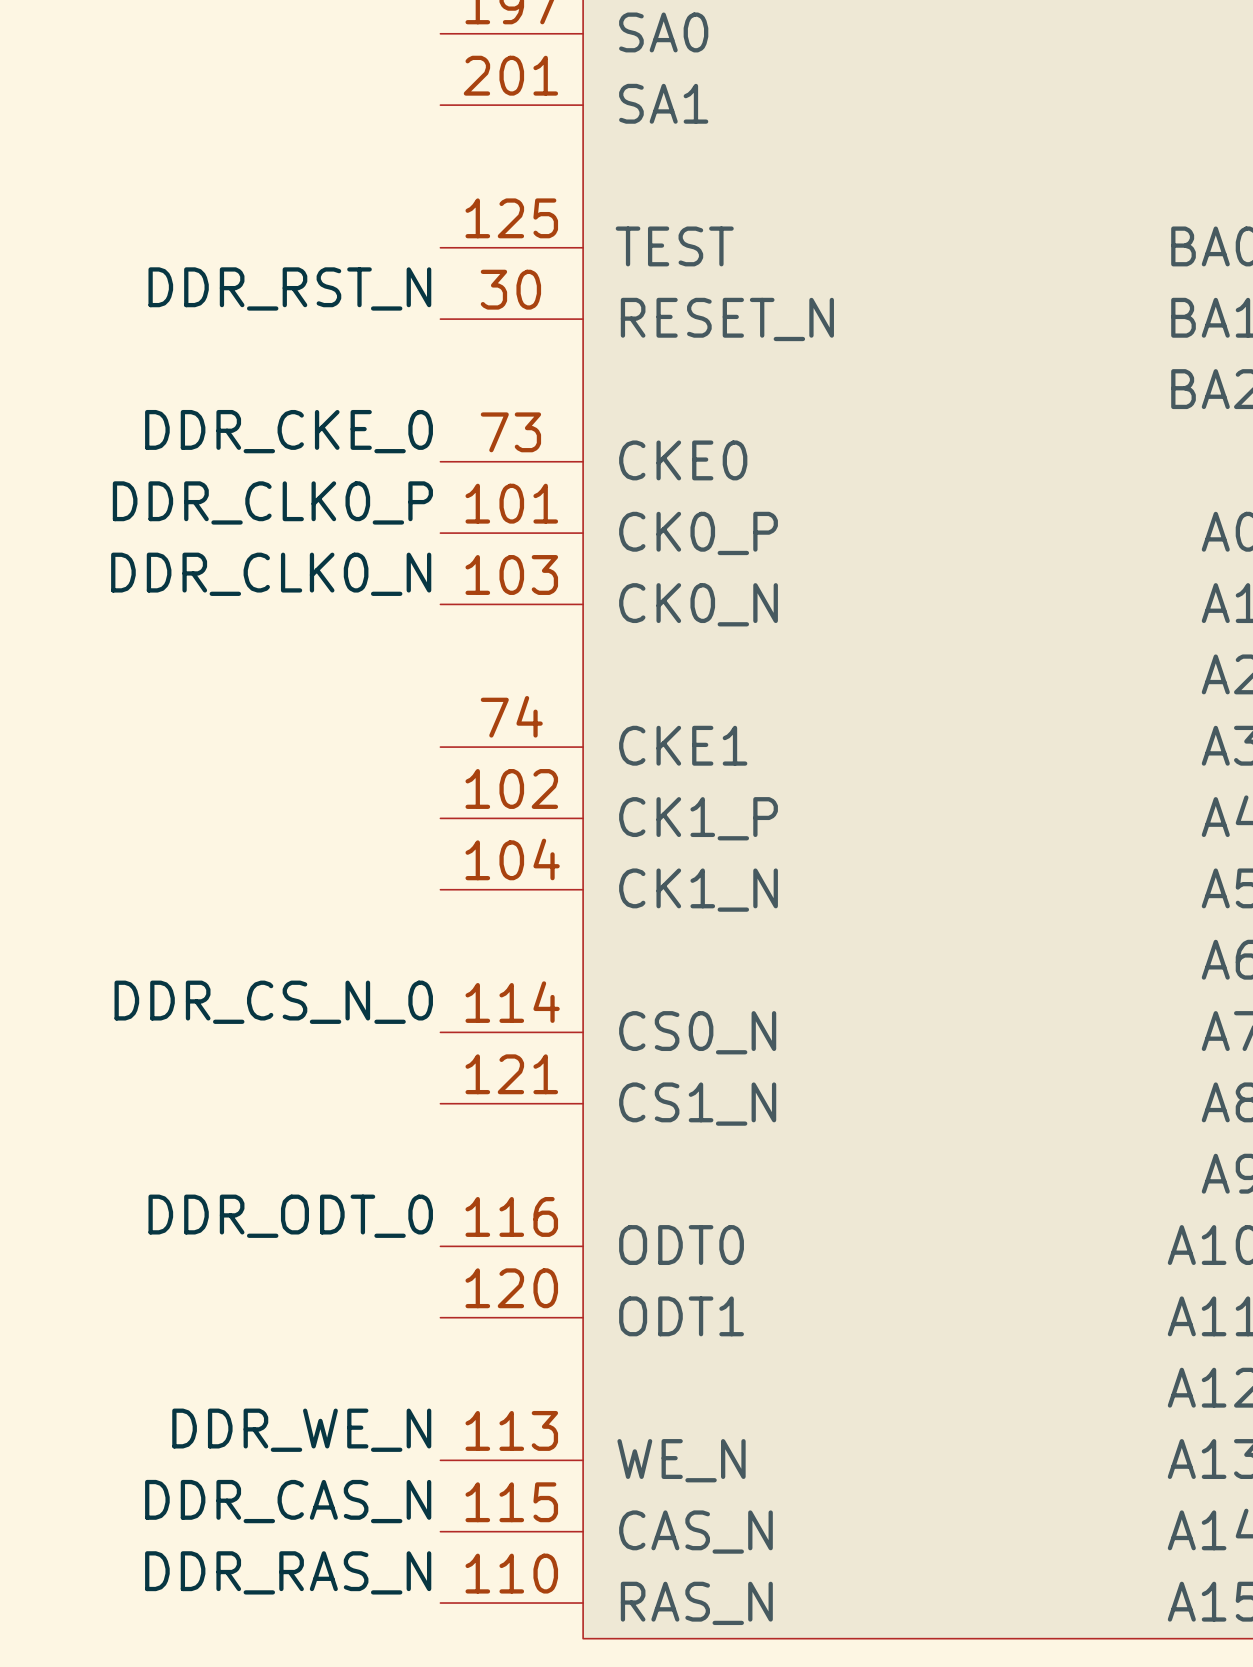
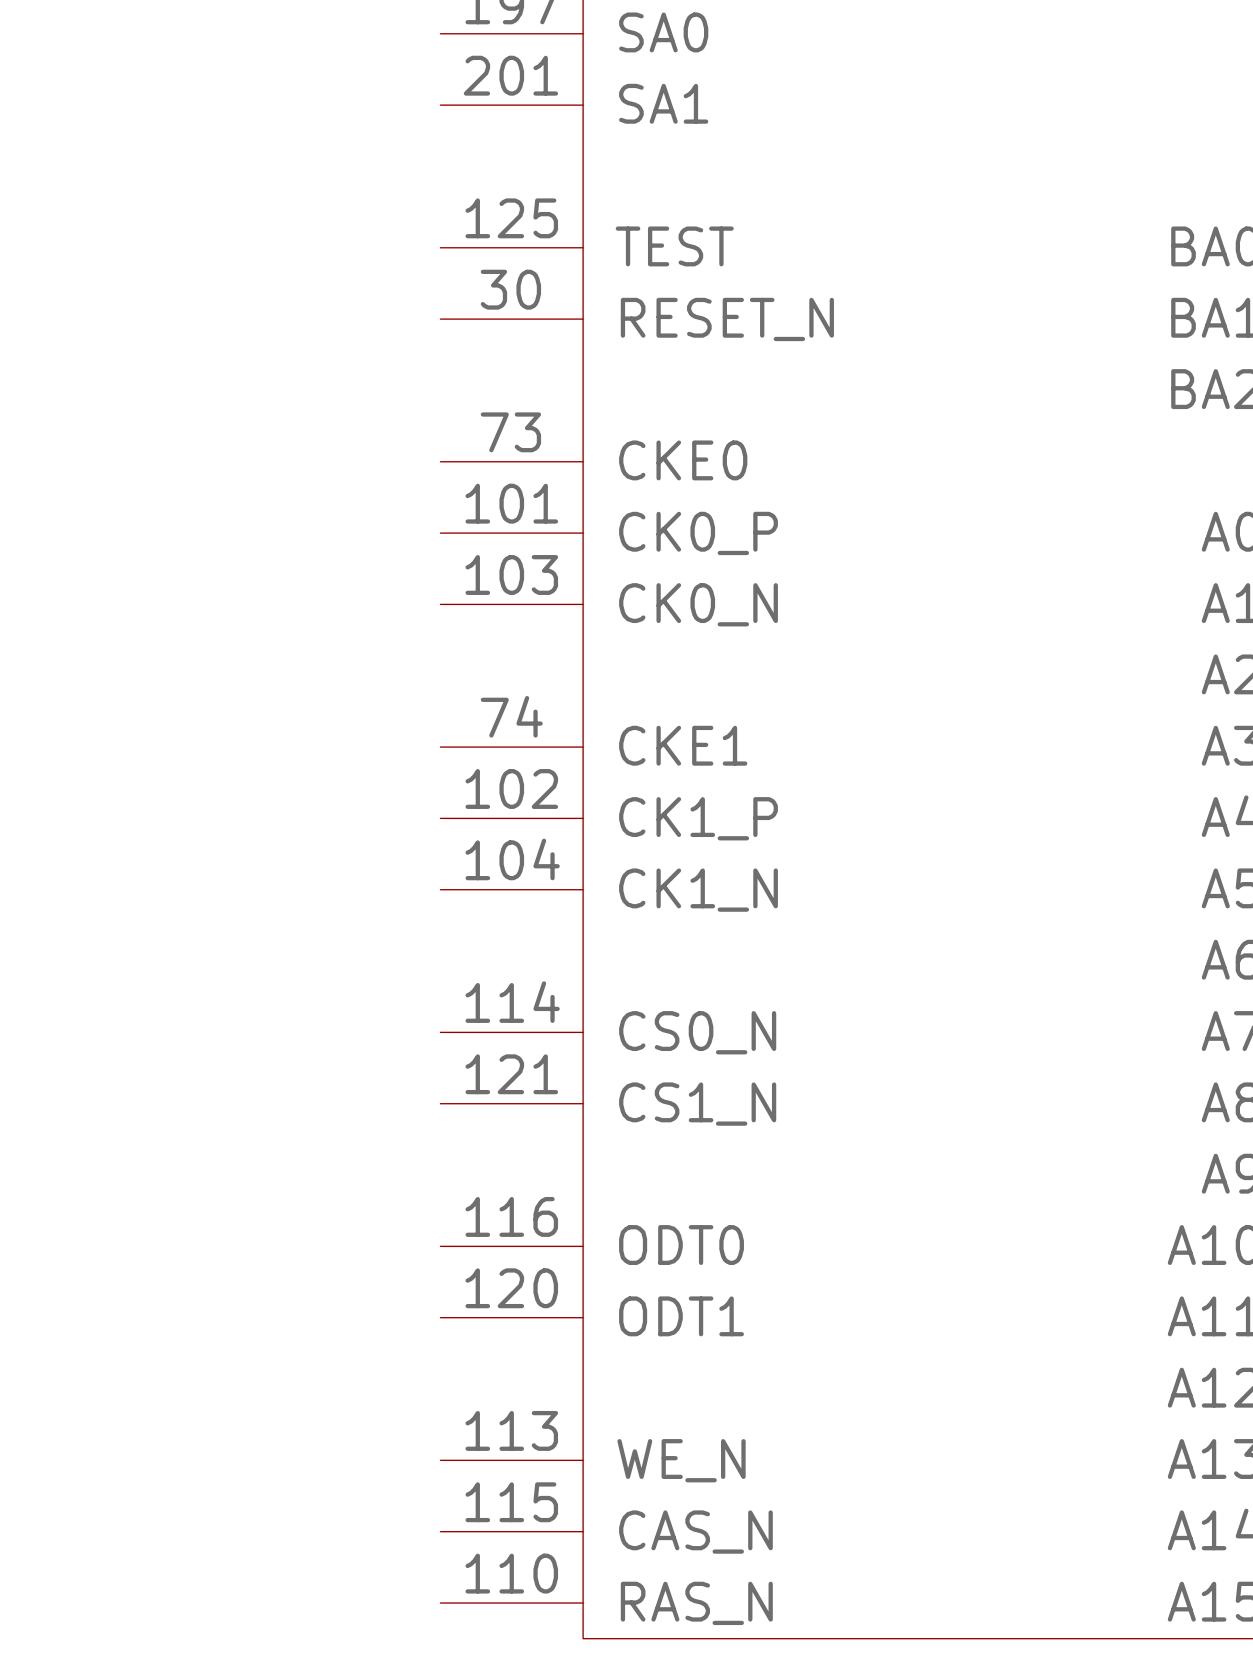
label: DDR_RST_N (289, 288) -> none
label: DDR_CKE_0 (289, 431) -> none
label: DDR_CLK0_P (272, 502) -> none
label: DDR_CLK0_N (271, 574) -> none
label: DDR_CS_N_0 (273, 1002) -> none
label: DDR_ODT_0 (290, 1216) -> none
label: DDR_WE_N (301, 1430) -> none
label: DDR_CAS_N (288, 1501) -> none
label: DDR_RAS_N (288, 1572) -> none

